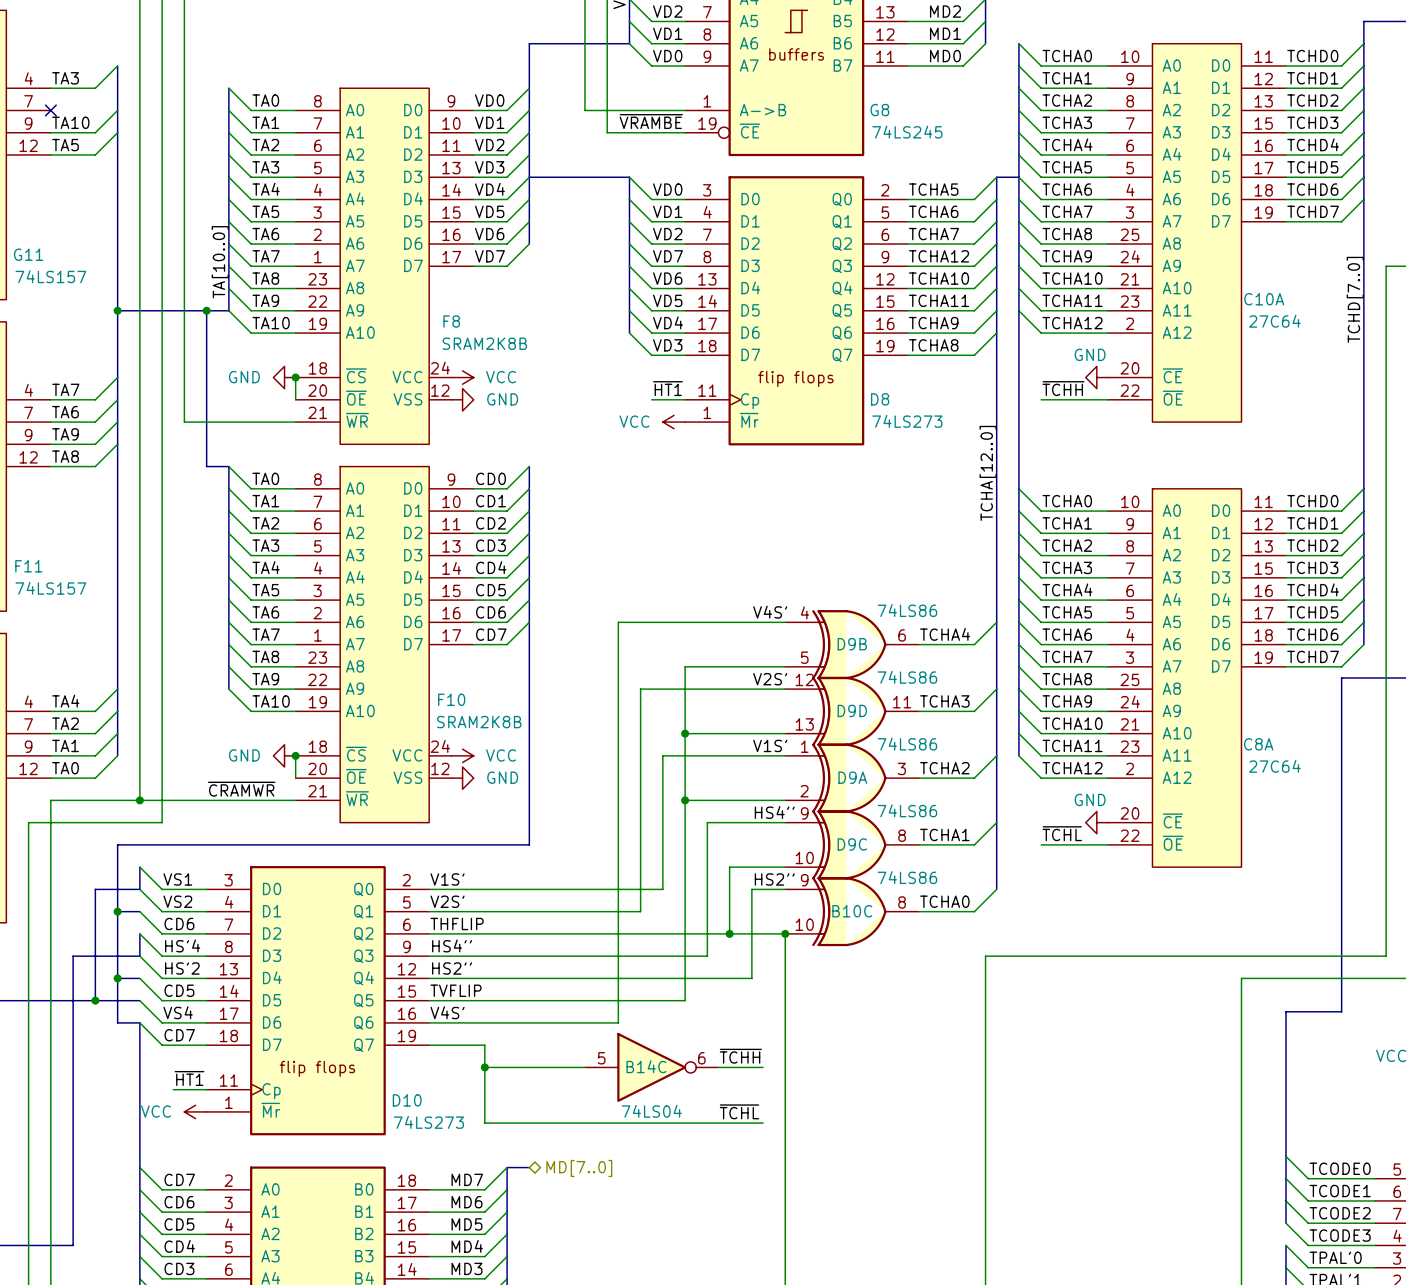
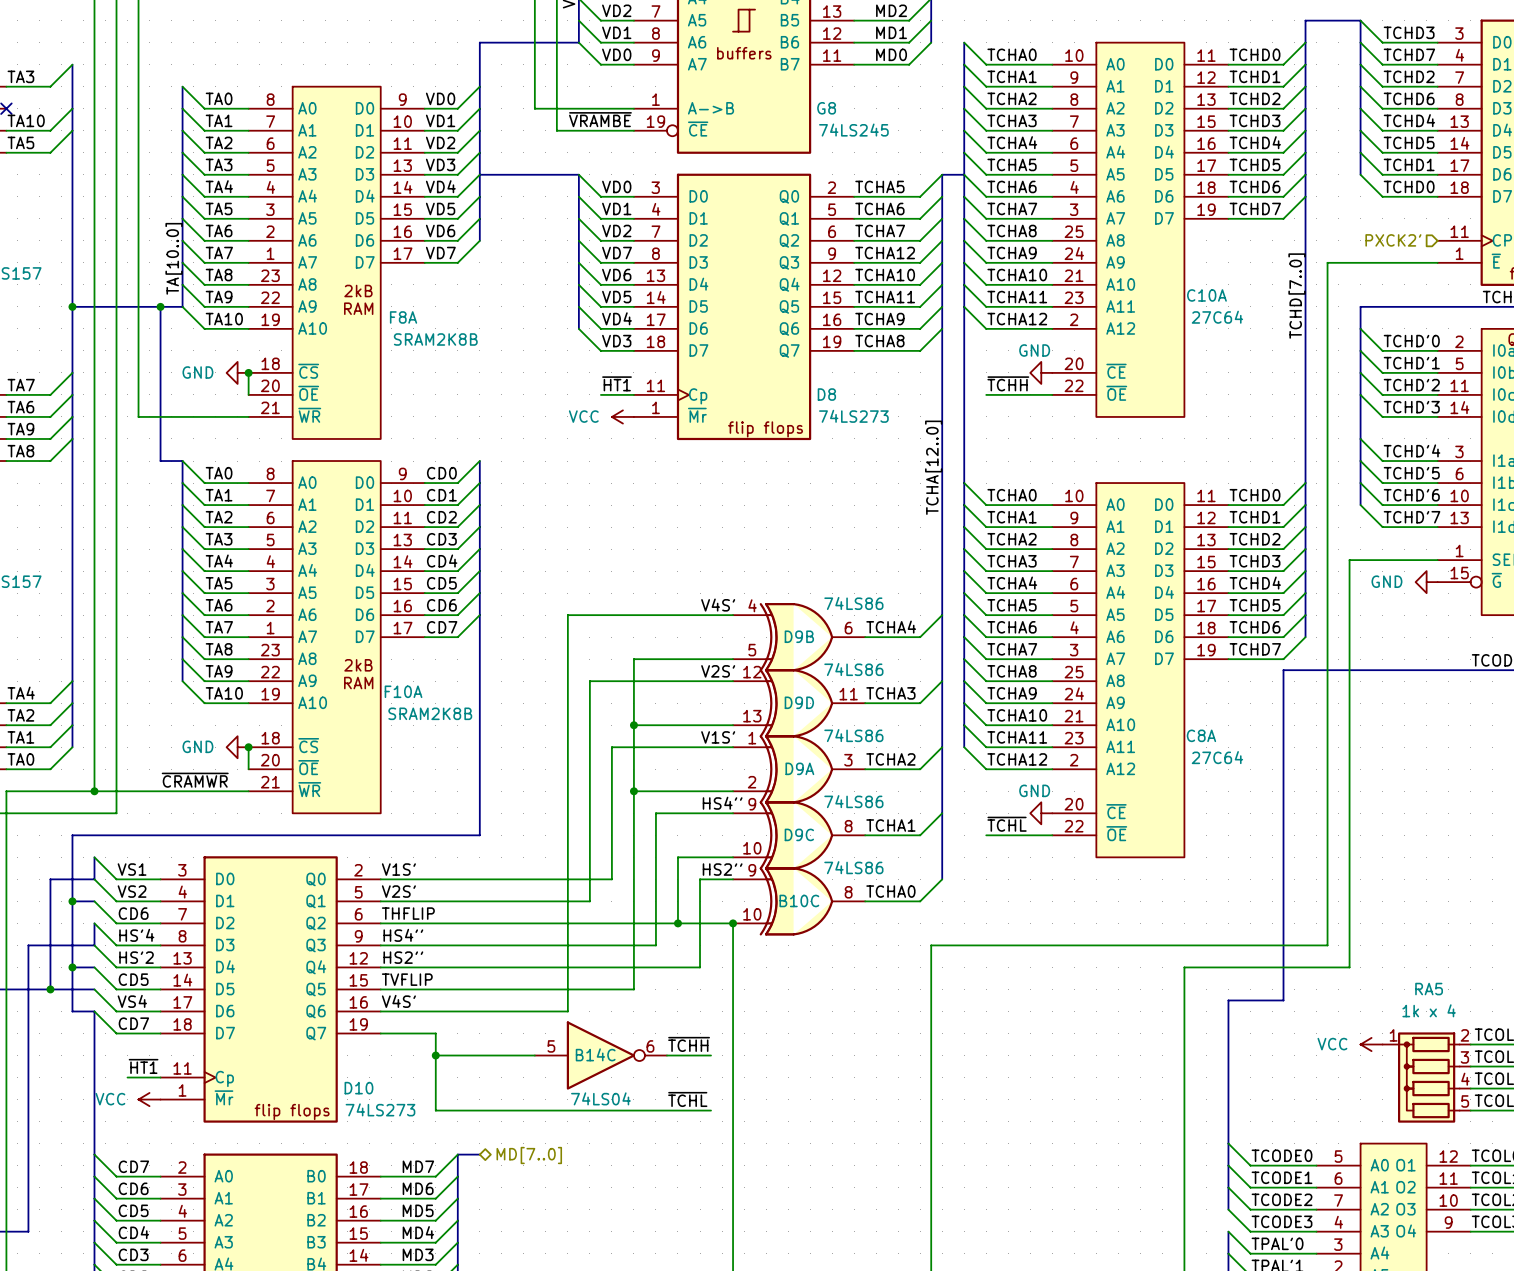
F8: SRAM2K8B (384, 266) -> none
F8A: none -> SRAM2K8B (336, 262)
power symbol: VCC (462, 377) -> none
D8 text position: flip flops (795, 378) -> flip flops (765, 429)
power symbol: GND (462, 399) -> none
F10: SRAM2K8B (384, 644) -> none
F10A: none -> SRAM2K8B (336, 637)
power symbol: VCC (462, 755) -> none
power symbol: GND (462, 778) -> none
D10 text position: flip flops (317, 1068) -> flip flops (292, 1111)

